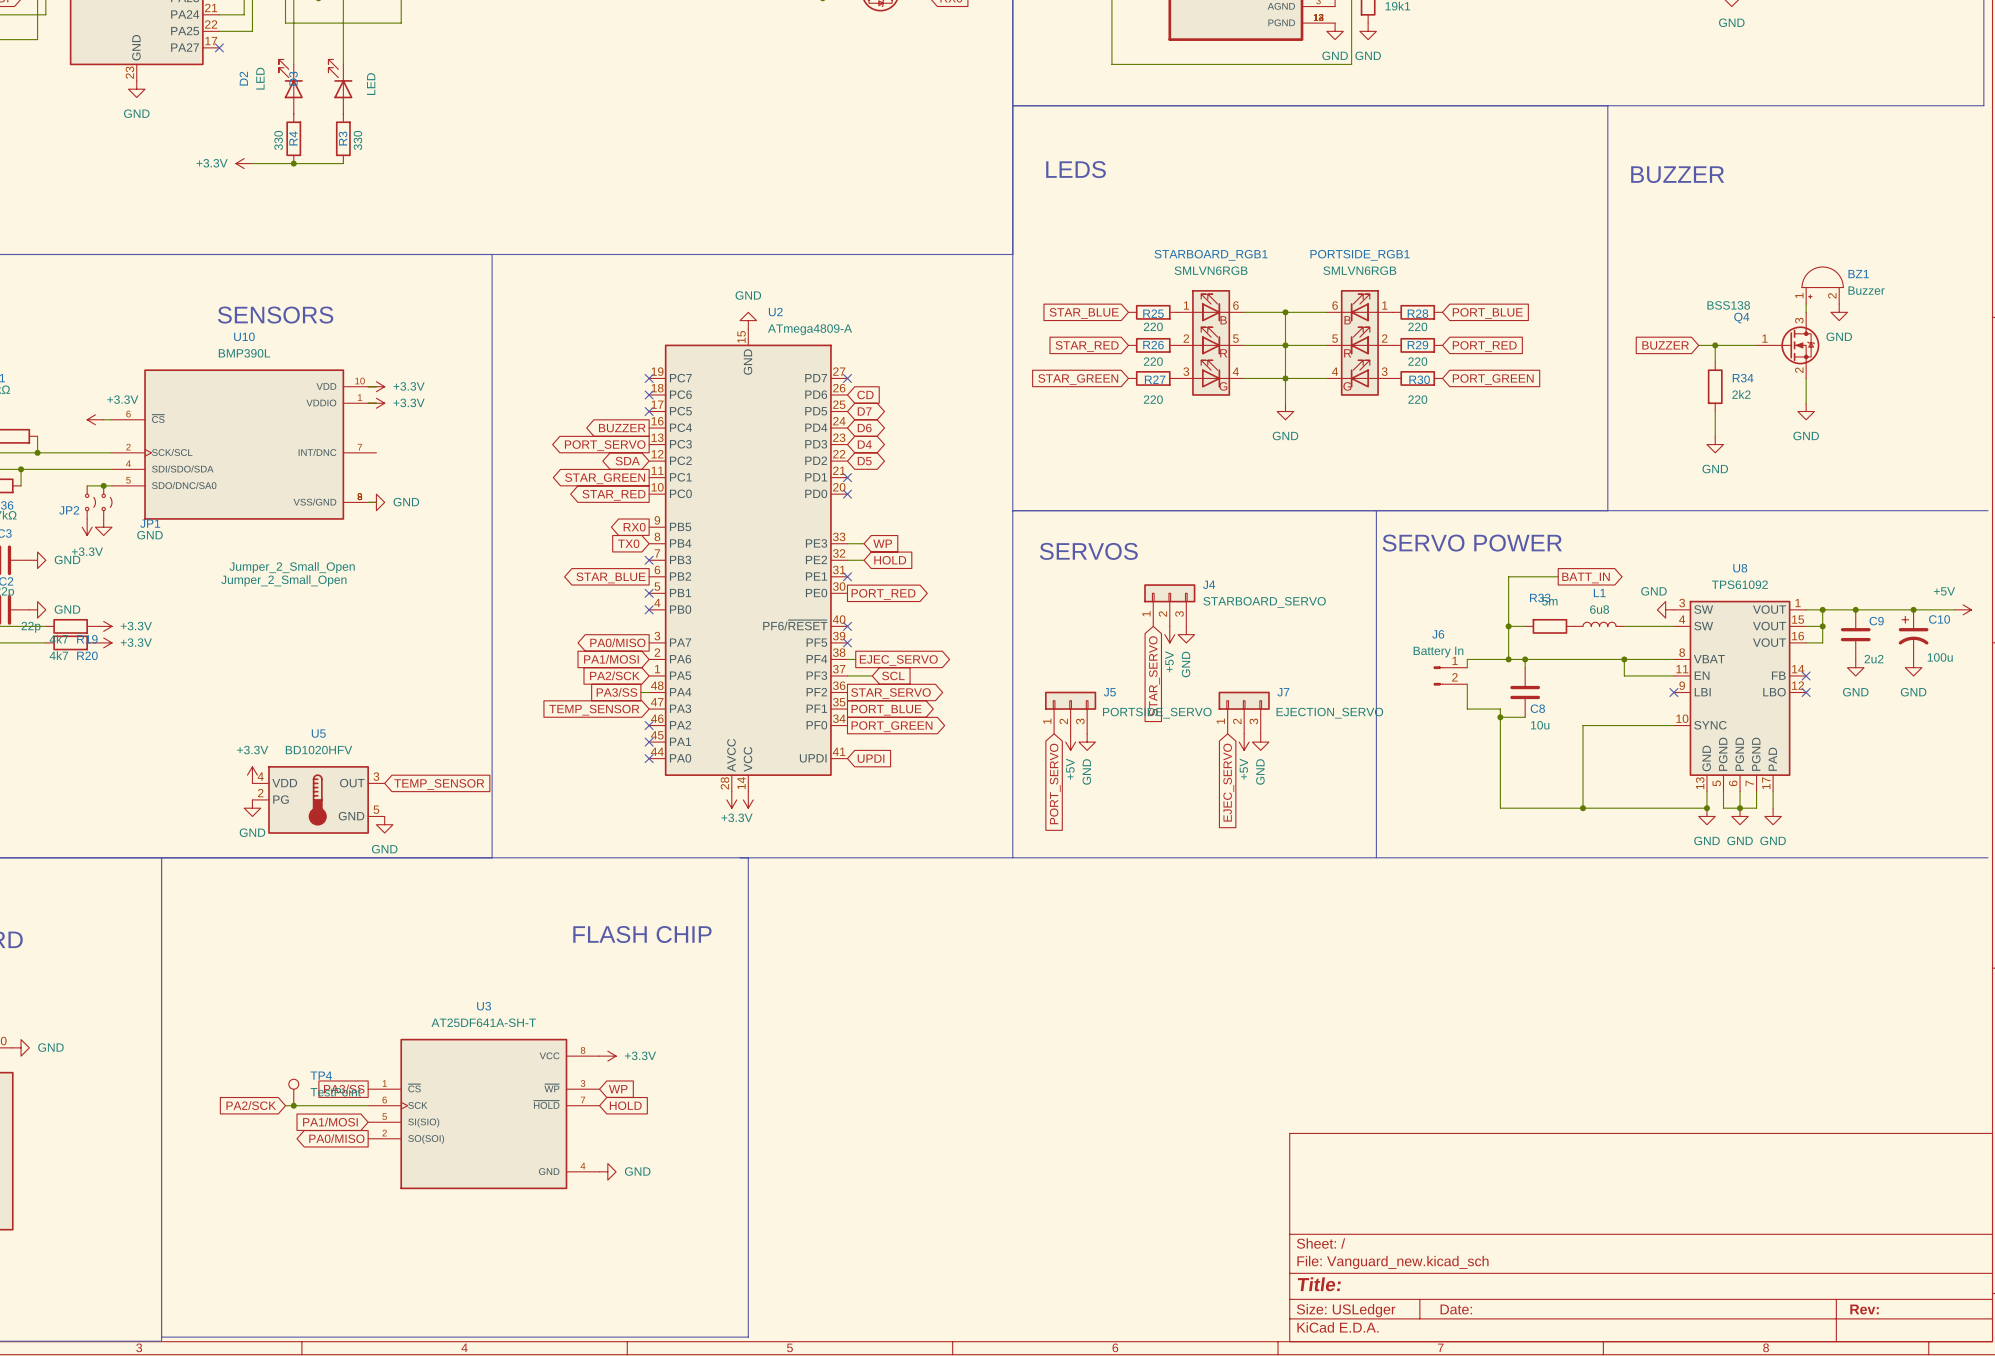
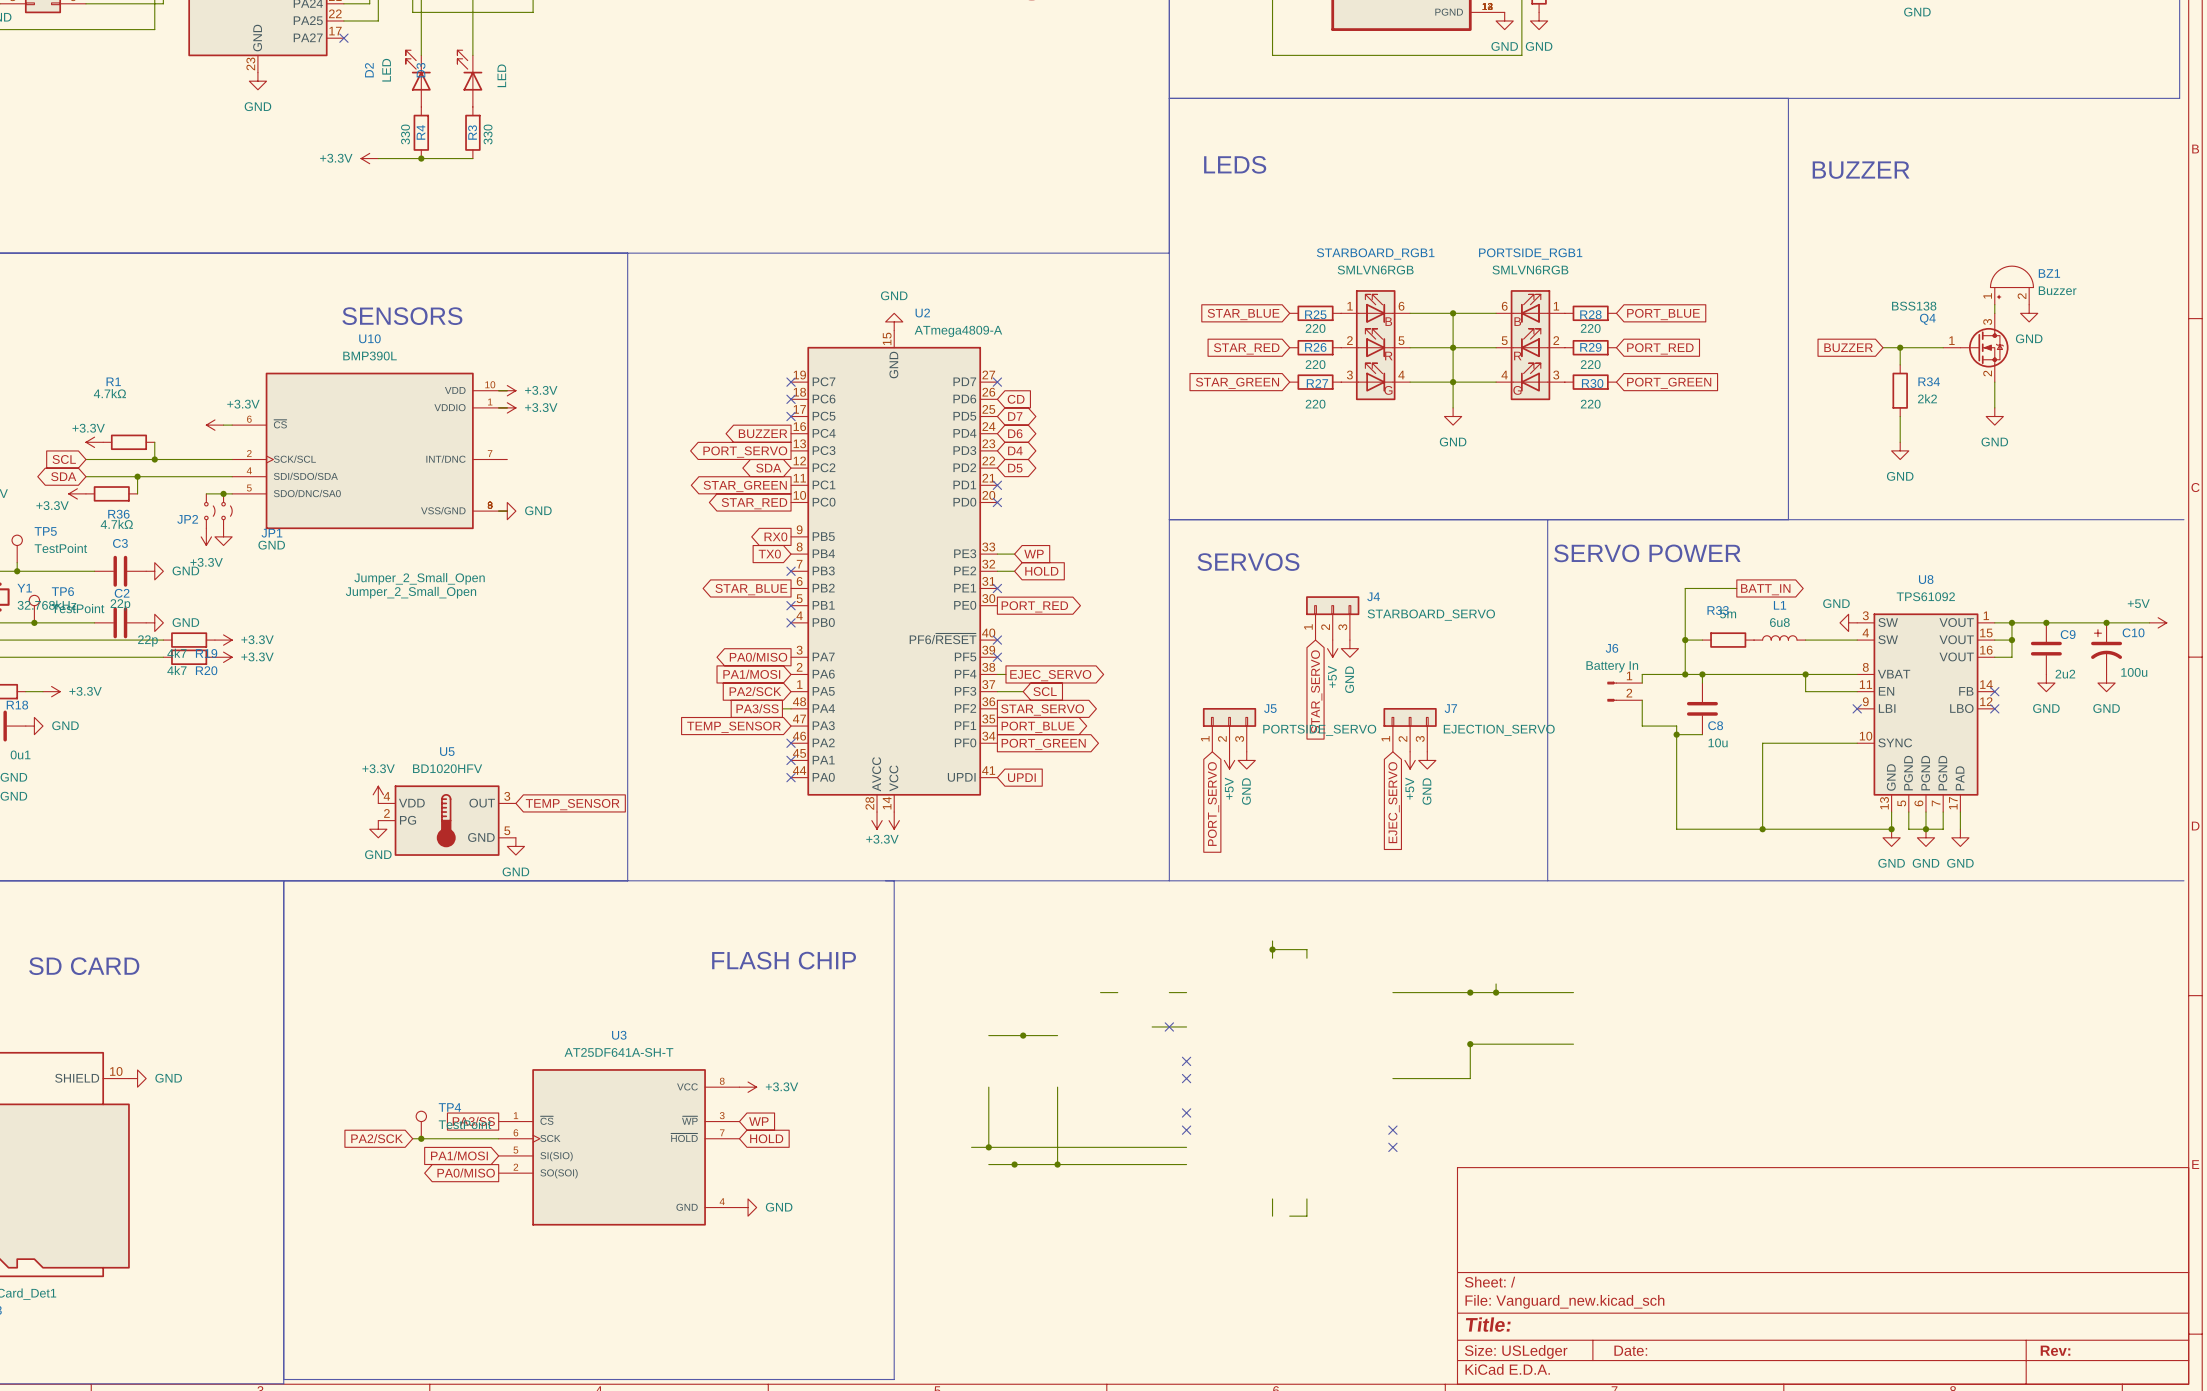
wire: none -> (1272, 941) (1272, 958)
wire: none -> (1272, 949) (1306, 949) (1306, 958)
junction: none -> (1272, 949)
wire: none -> (1496, 983) (1496, 992)
wire: none -> (1100, 992) (1117, 992)
wire: none -> (1169, 992) (1186, 992)
wire: none -> (1392, 992) (1573, 992)
junction: none -> (1470, 992)
junction: none -> (1496, 992)
wire: none -> (1152, 1026) (1186, 1026)
no-connect mark: none -> (1169, 1026)
wire: none -> (988, 1035) (1057, 1035)
junction: none -> (1023, 1035)
junction: none -> (1470, 1044)
wire: none -> (1573, 1044) (1470, 1044) (1470, 1078) (1392, 1078)
no-connect mark: none -> (1186, 1061)
no-connect mark: none -> (1186, 1078)
wire: none -> (988, 1087) (988, 1147)
wire: none -> (1057, 1087) (1057, 1164)
no-connect mark: none -> (1186, 1112)
no-connect mark: none -> (1186, 1130)
no-connect mark: none -> (1392, 1130)
wire: none -> (971, 1147) (1186, 1147)
junction: none -> (988, 1147)
no-connect mark: none -> (1392, 1147)
wire: none -> (988, 1164) (1186, 1164)
junction: none -> (1014, 1164)
junction: none -> (1057, 1164)
wire: none -> (1272, 1198) (1272, 1216)
wire: none -> (1306, 1198) (1306, 1216) (1289, 1216)

